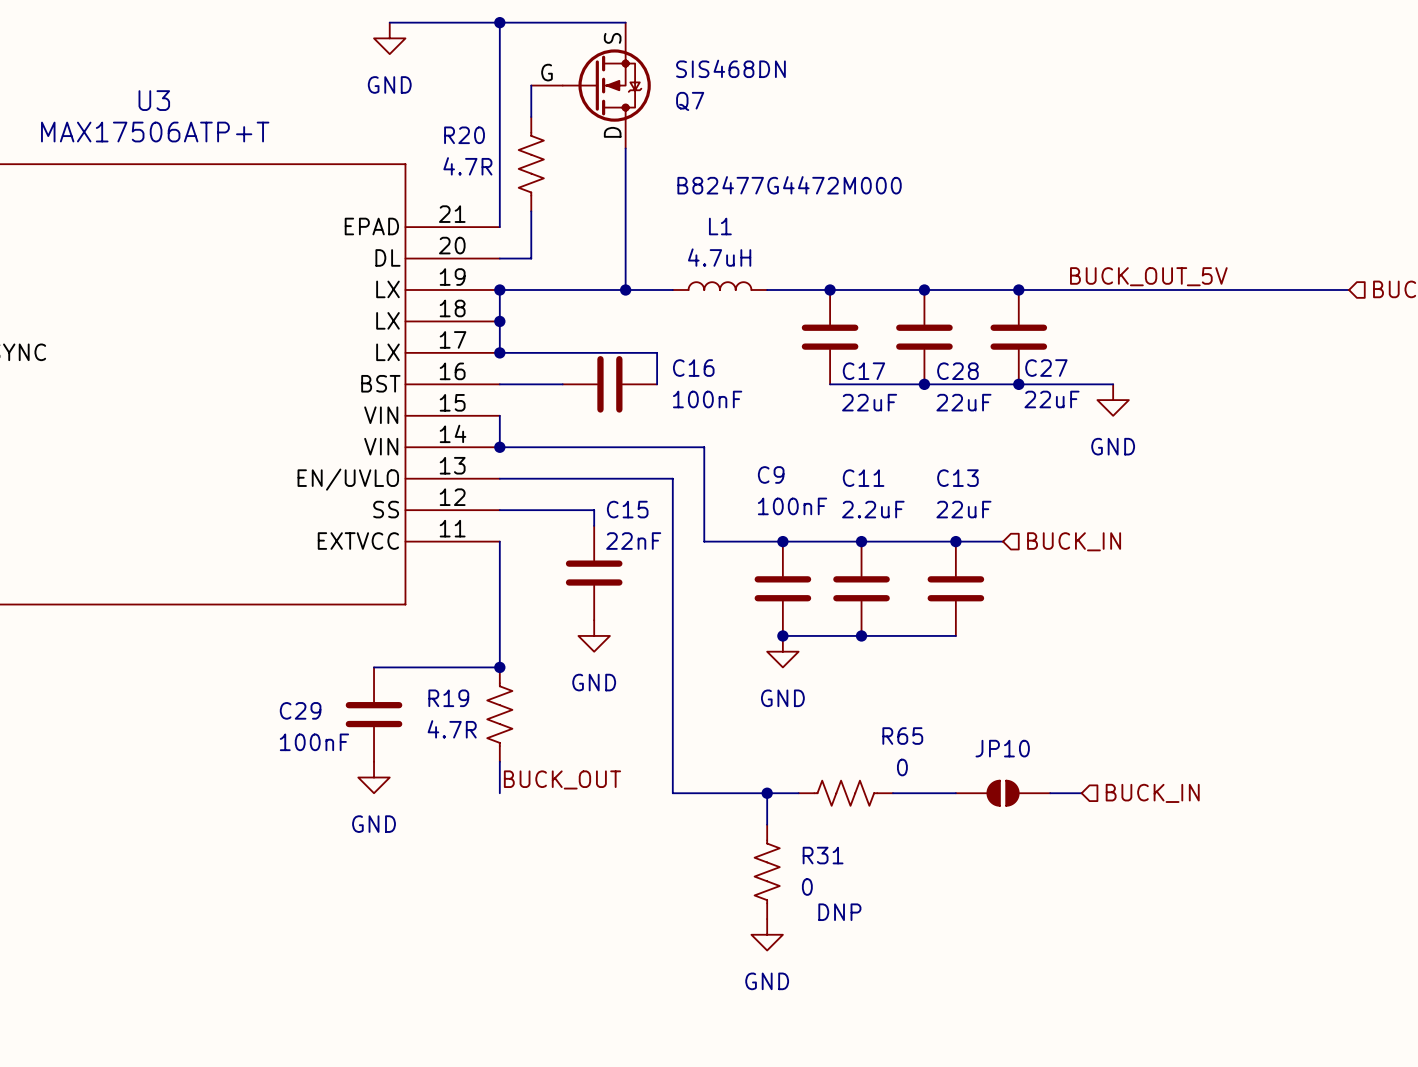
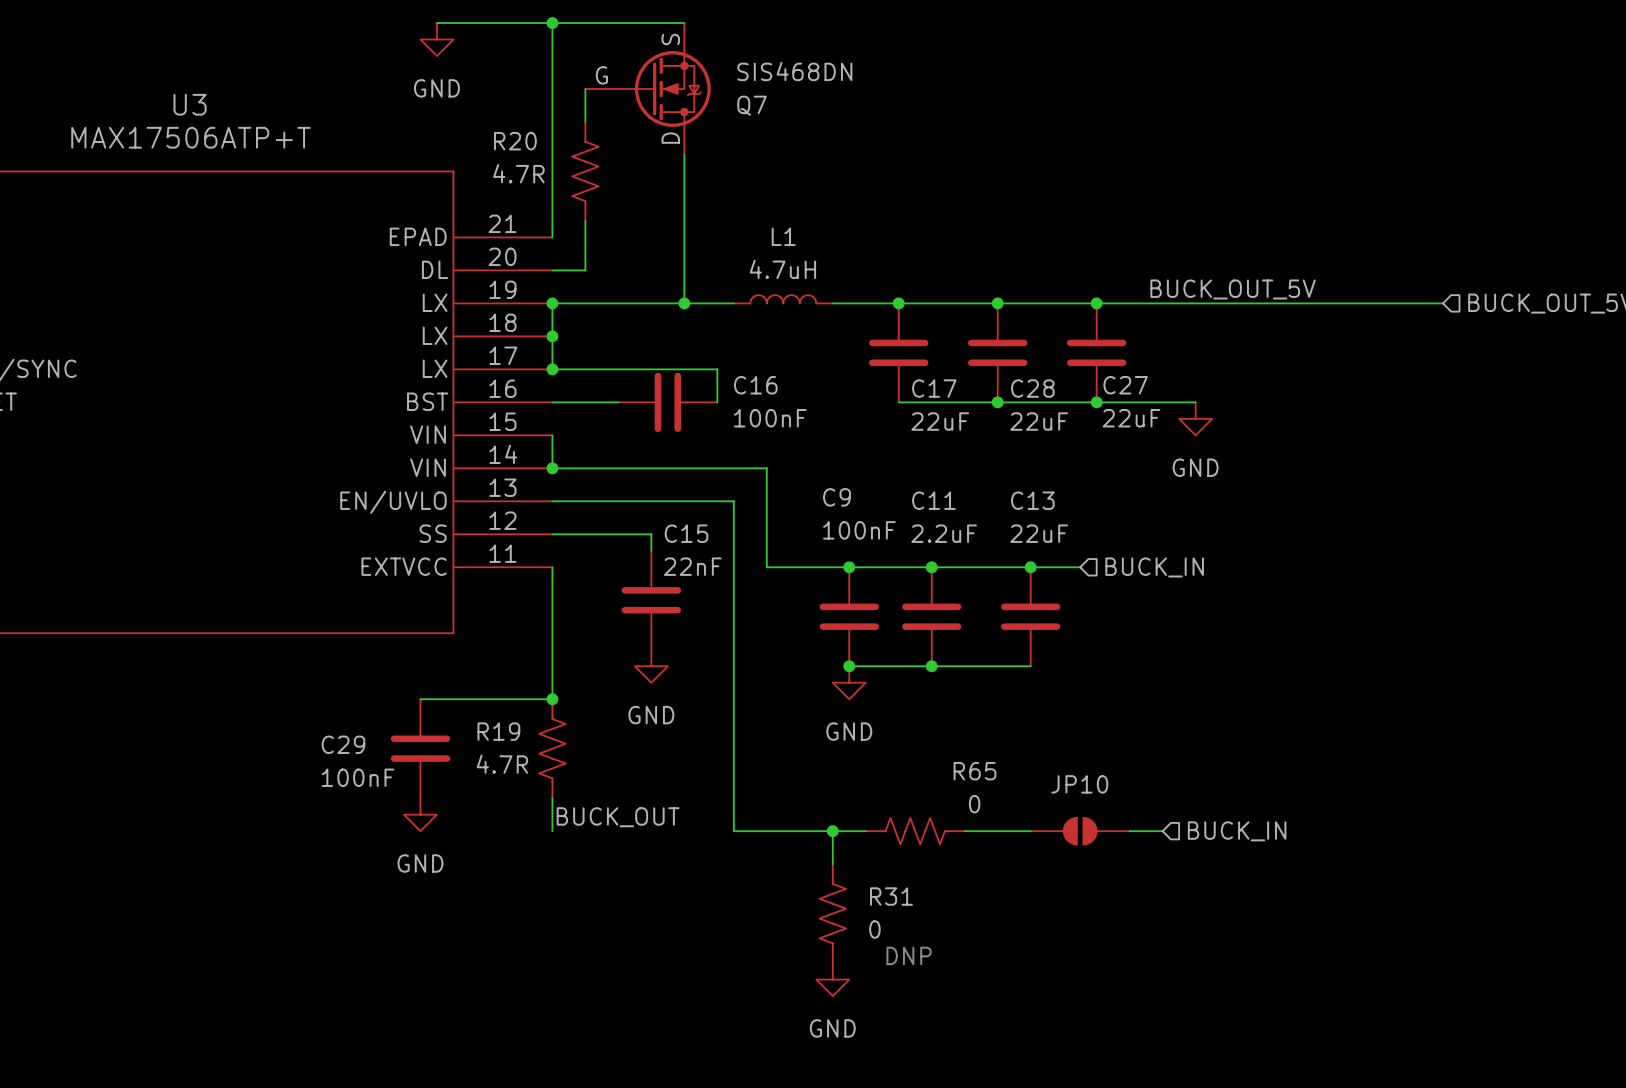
text: B82477G4472M000 (789, 185) -> none

